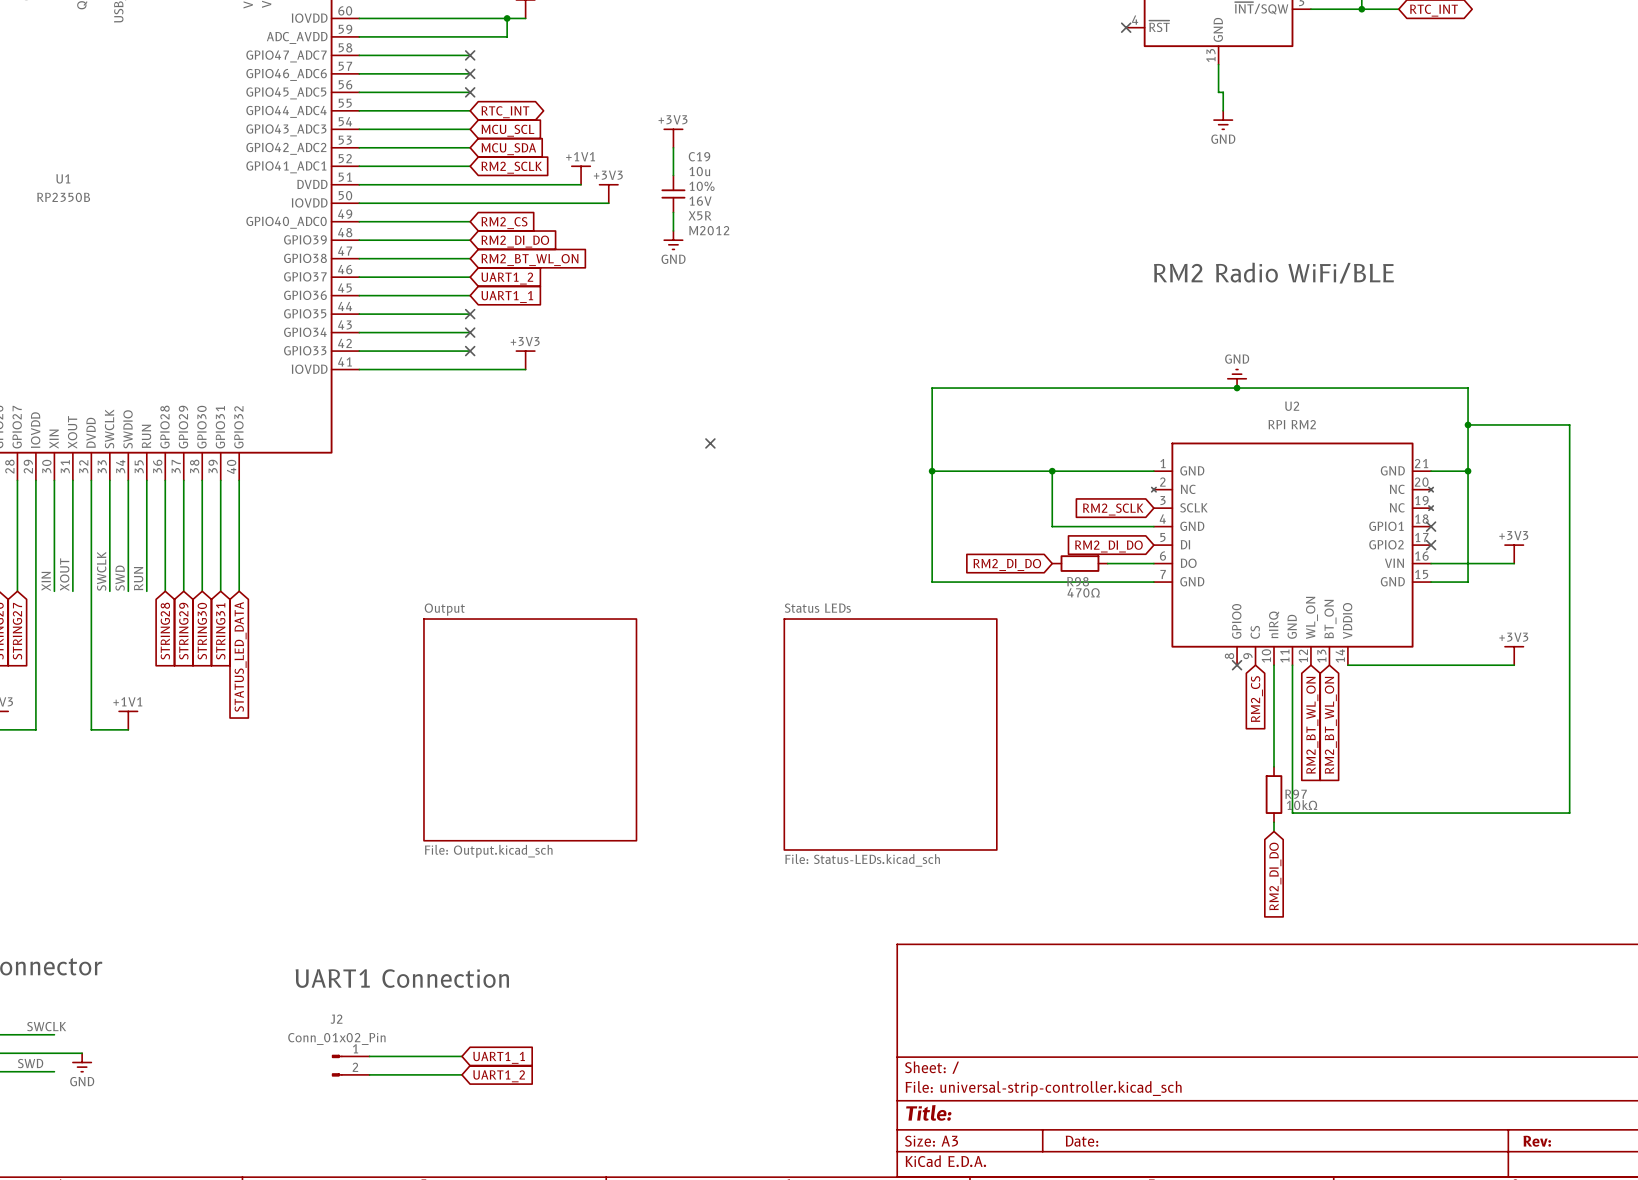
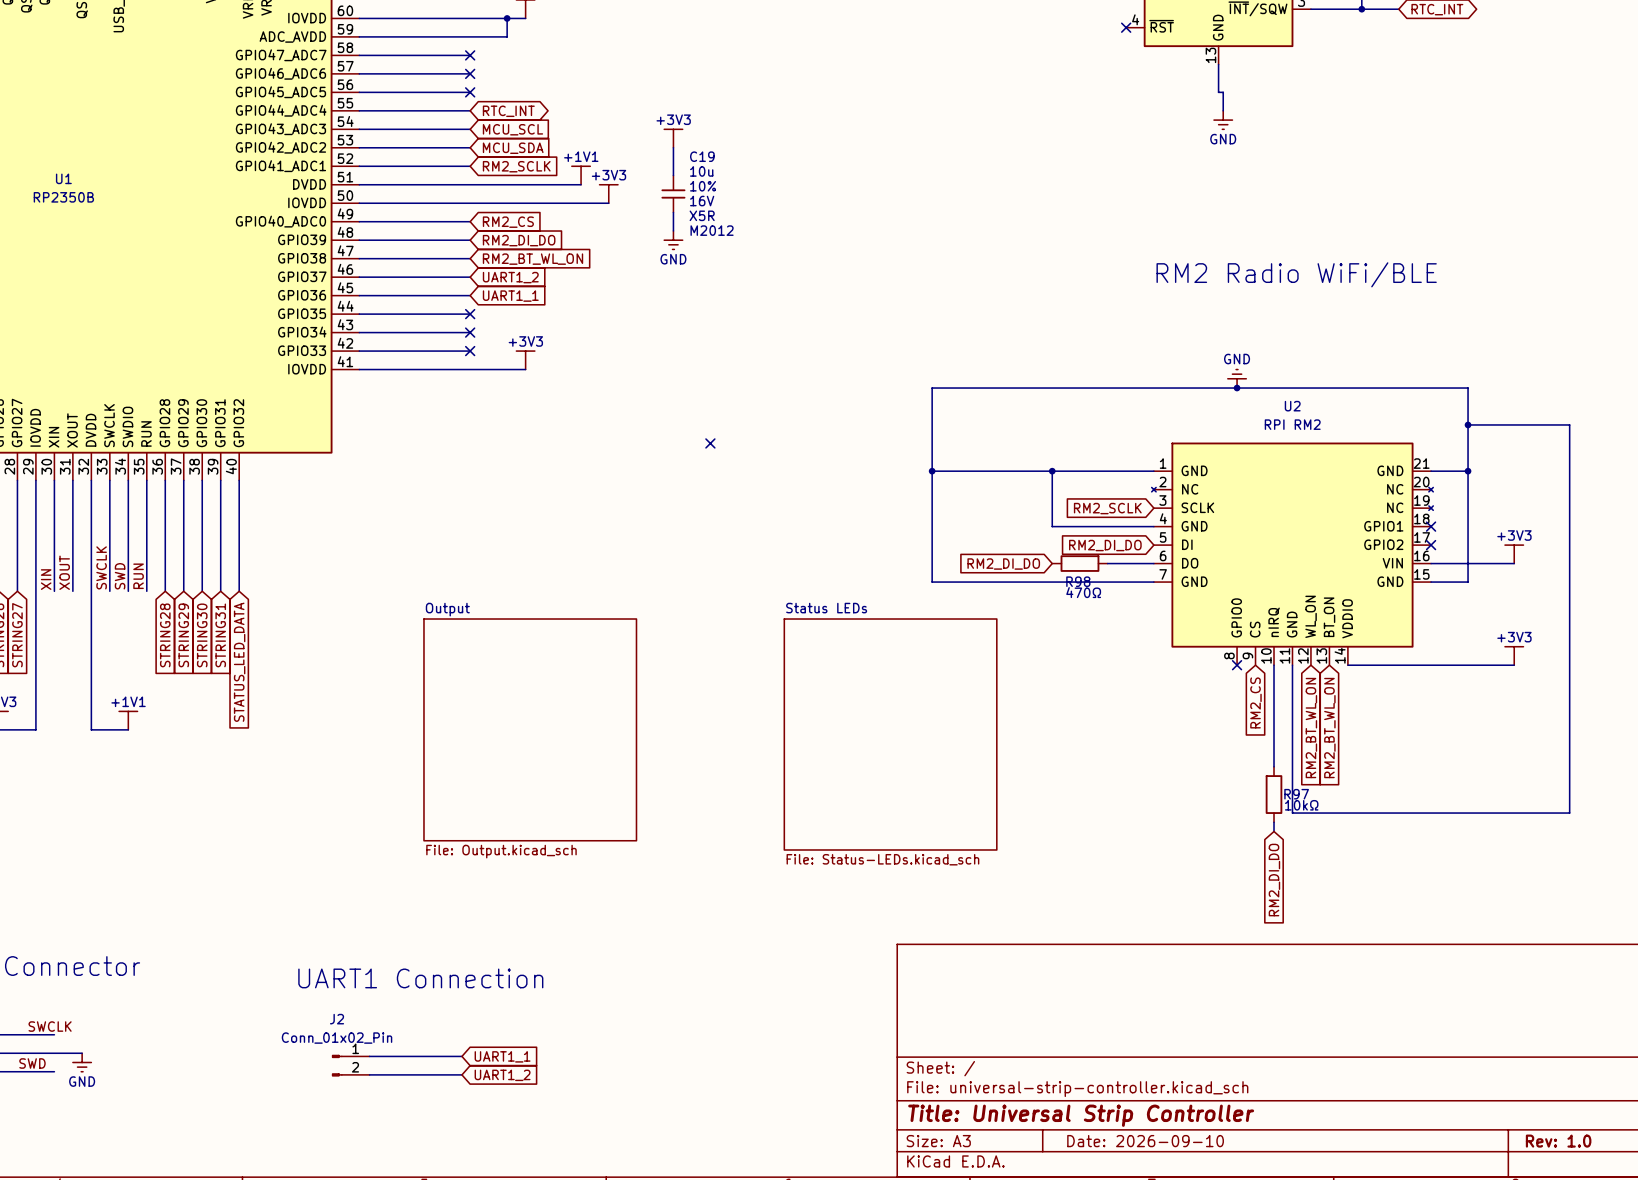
title block: Title: (928, 1112) -> Title: Universal Strip Controller (1081, 1115)
title block: Date: (1082, 1141) -> Date: 2026-09-10 (1145, 1141)
title block: Rev: (1537, 1141) -> Rev: 1.0 (1558, 1141)

